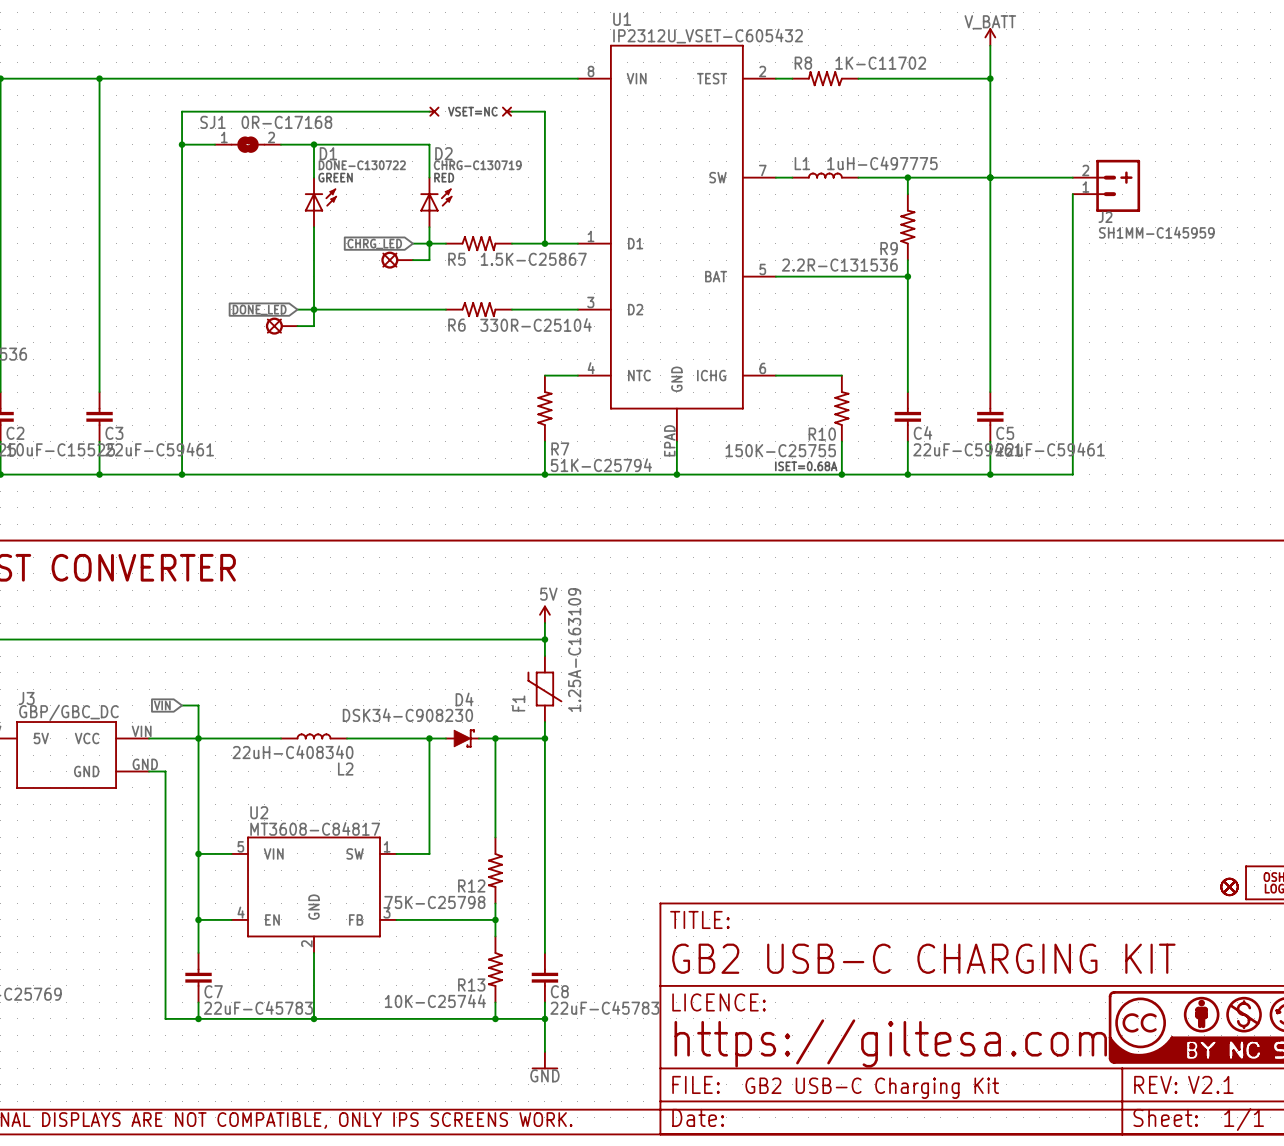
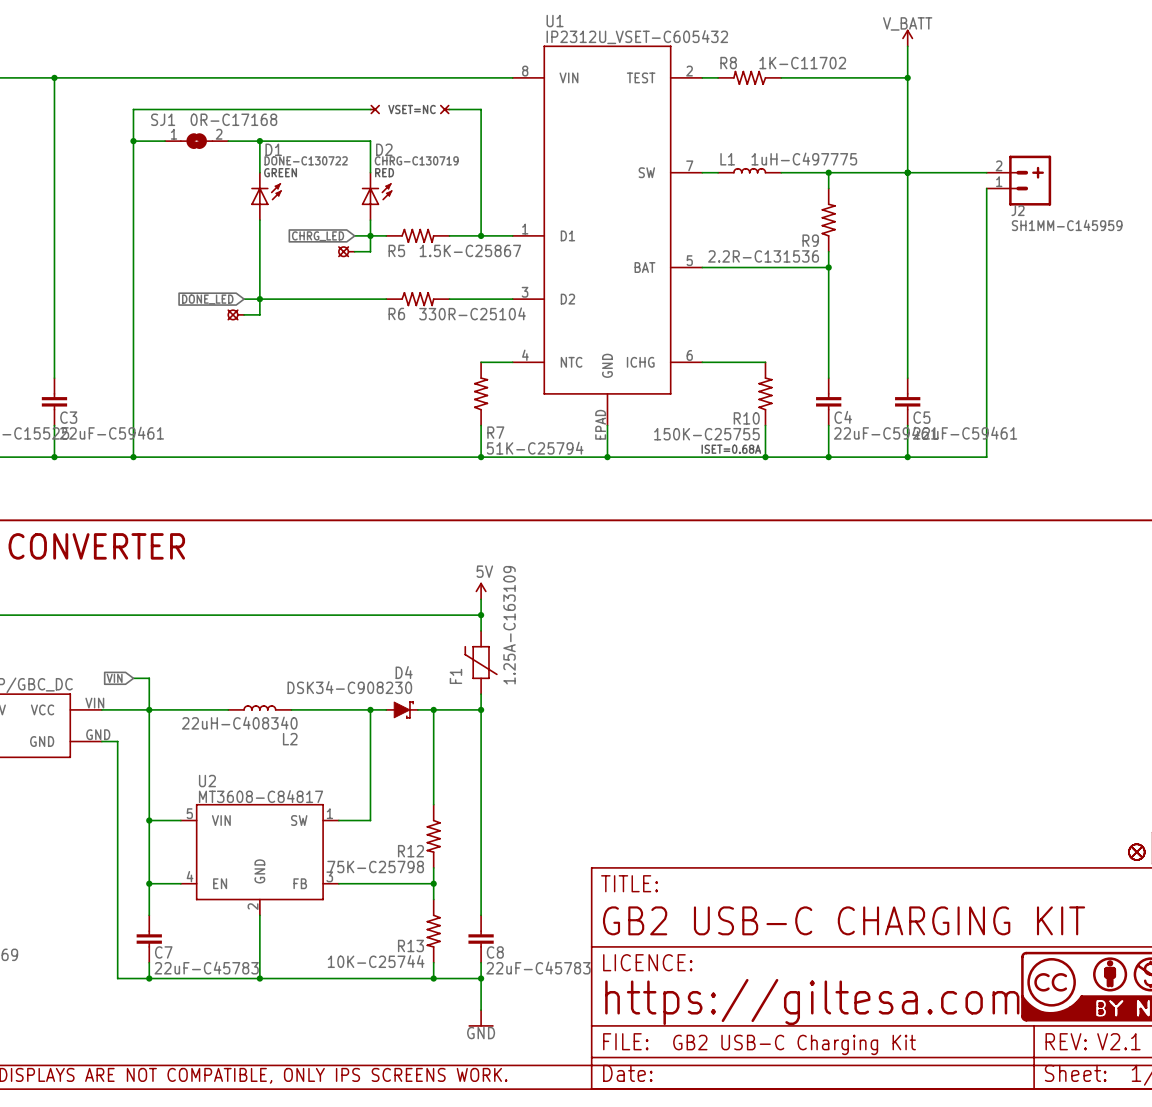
part: (397, 260) -> none
part: none -> (346, 251)
part: (282, 326) -> none
part: none -> (236, 314)

